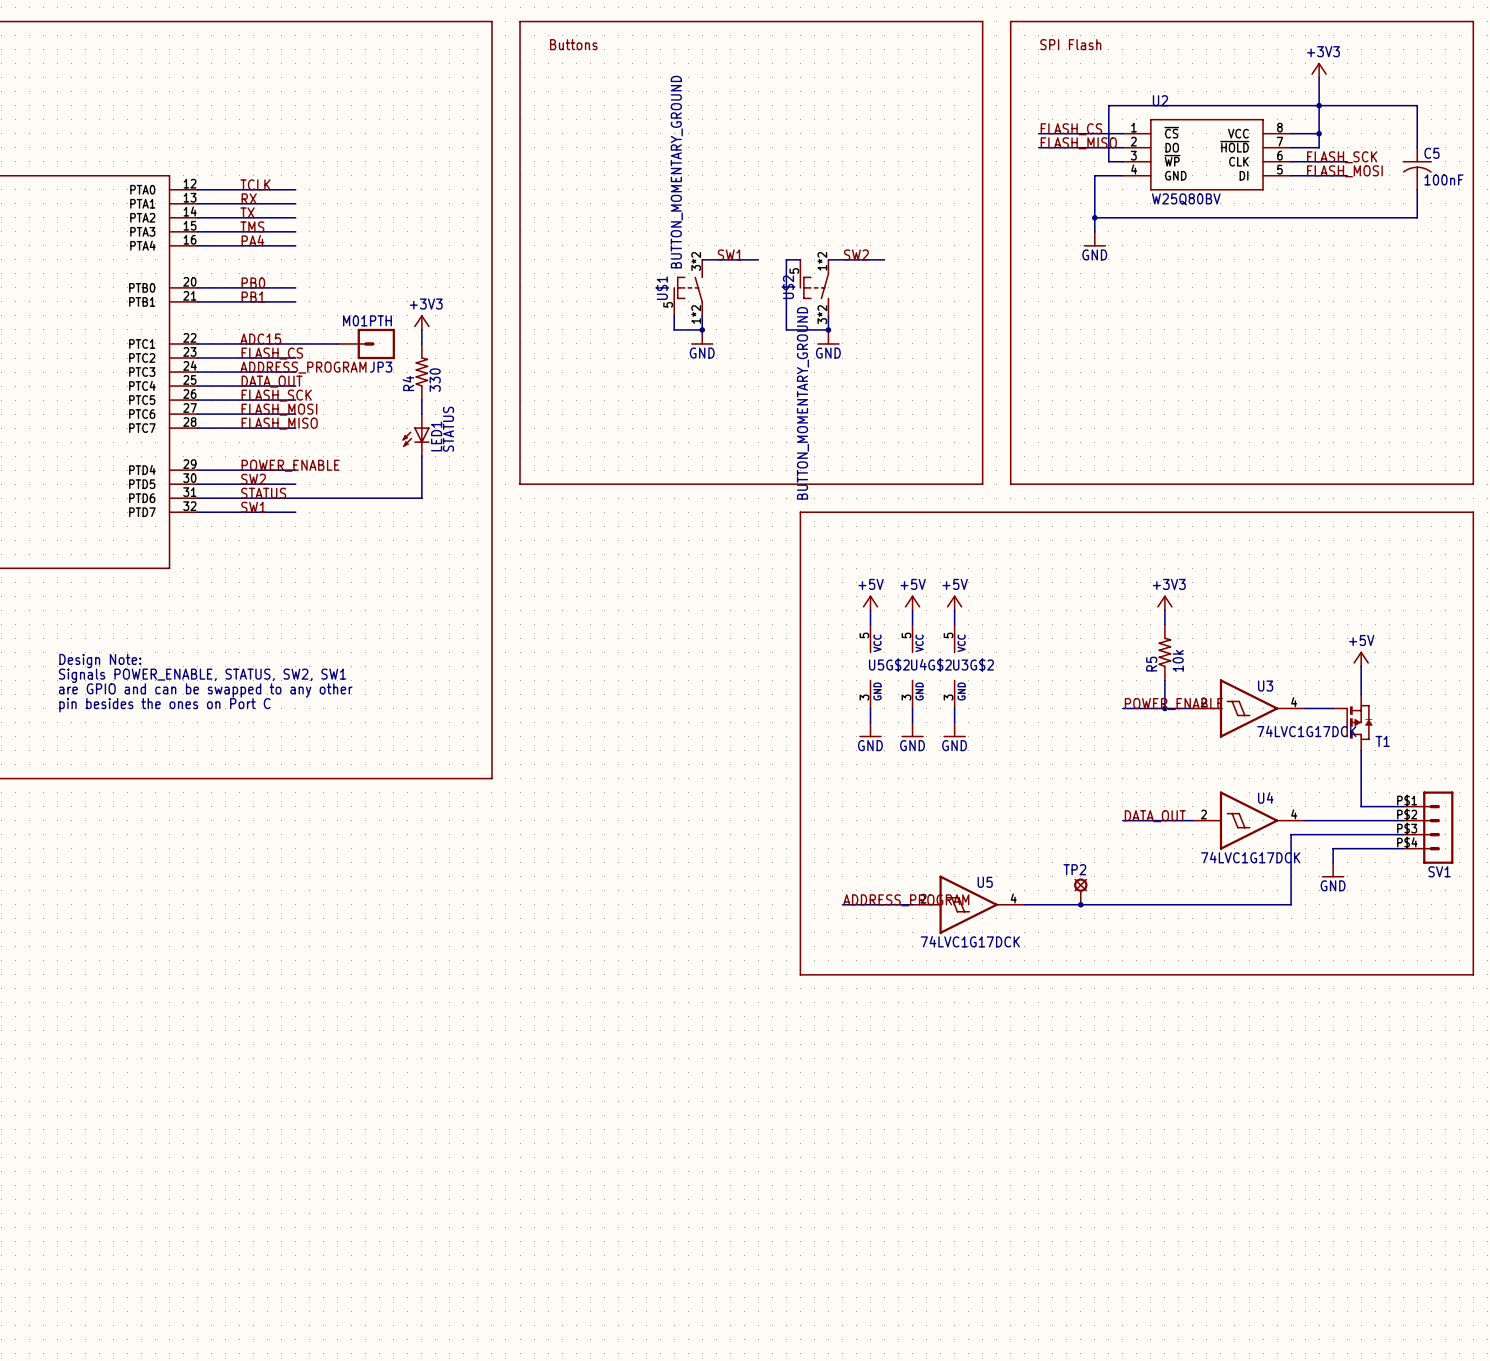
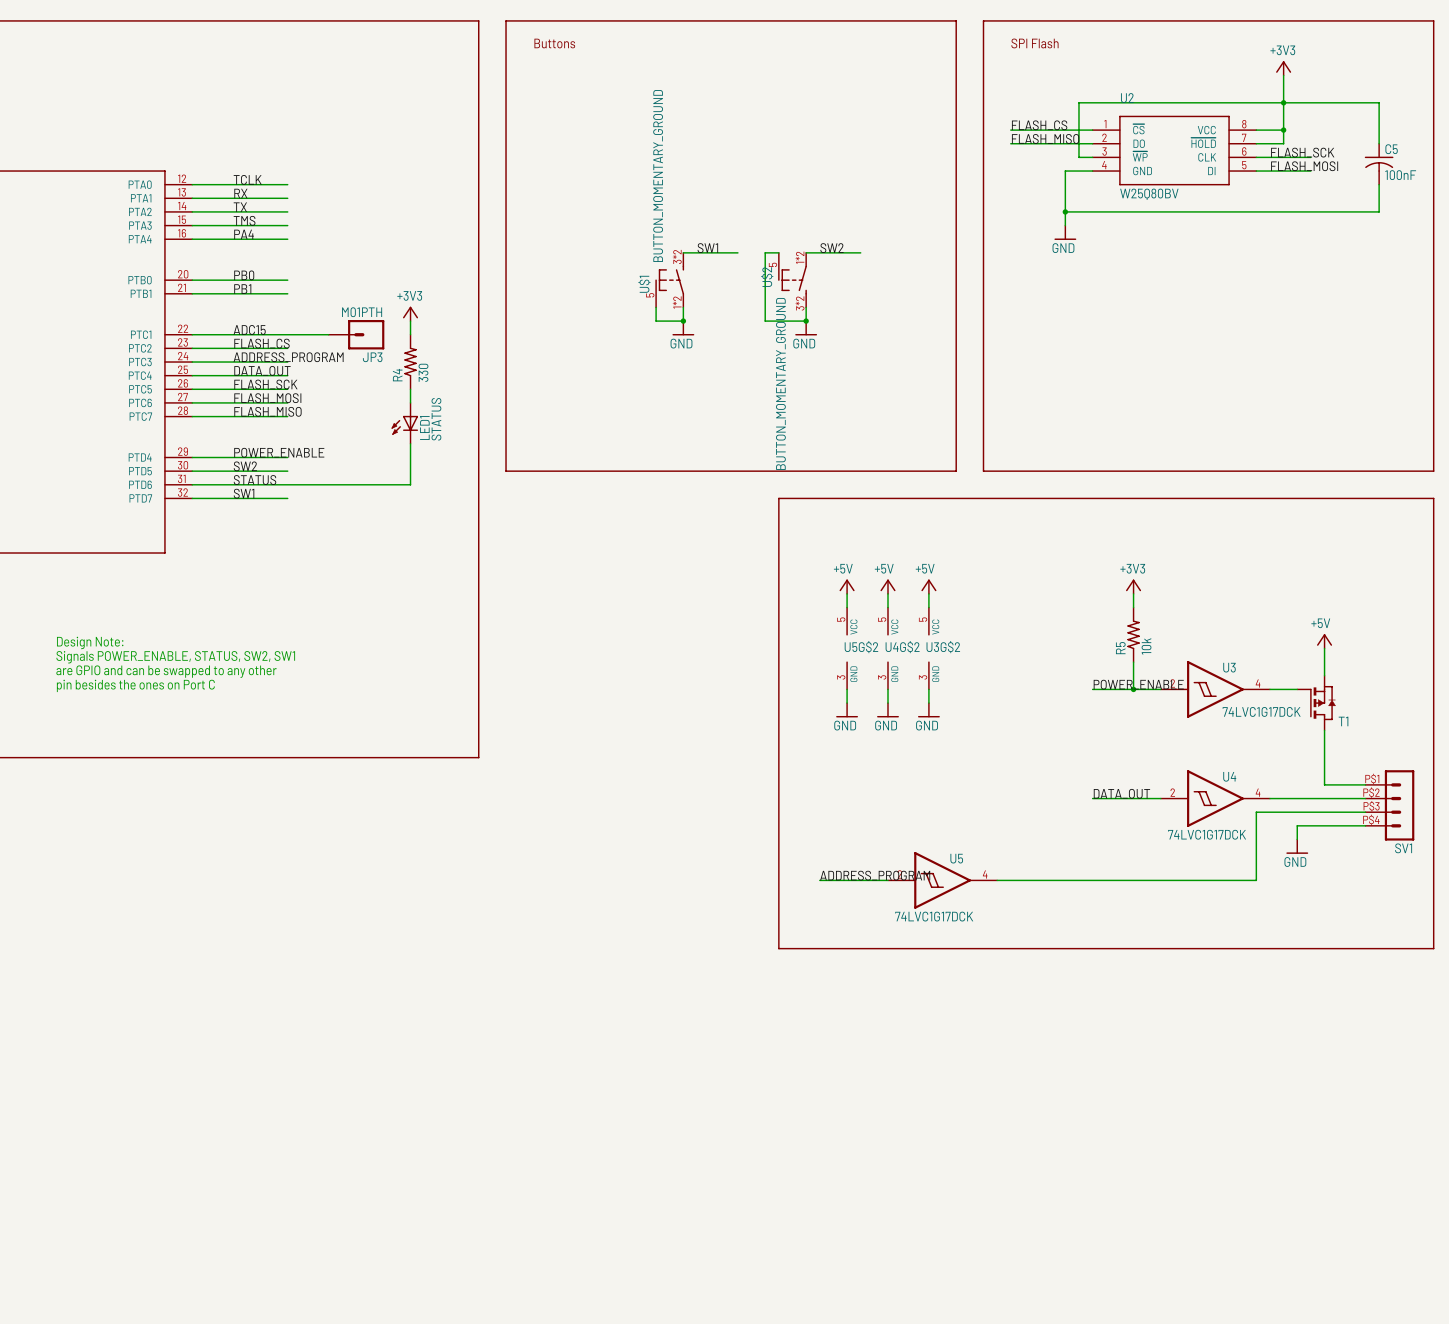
TP2: (1080, 891) -> none
junction: (1080, 904) -> none

